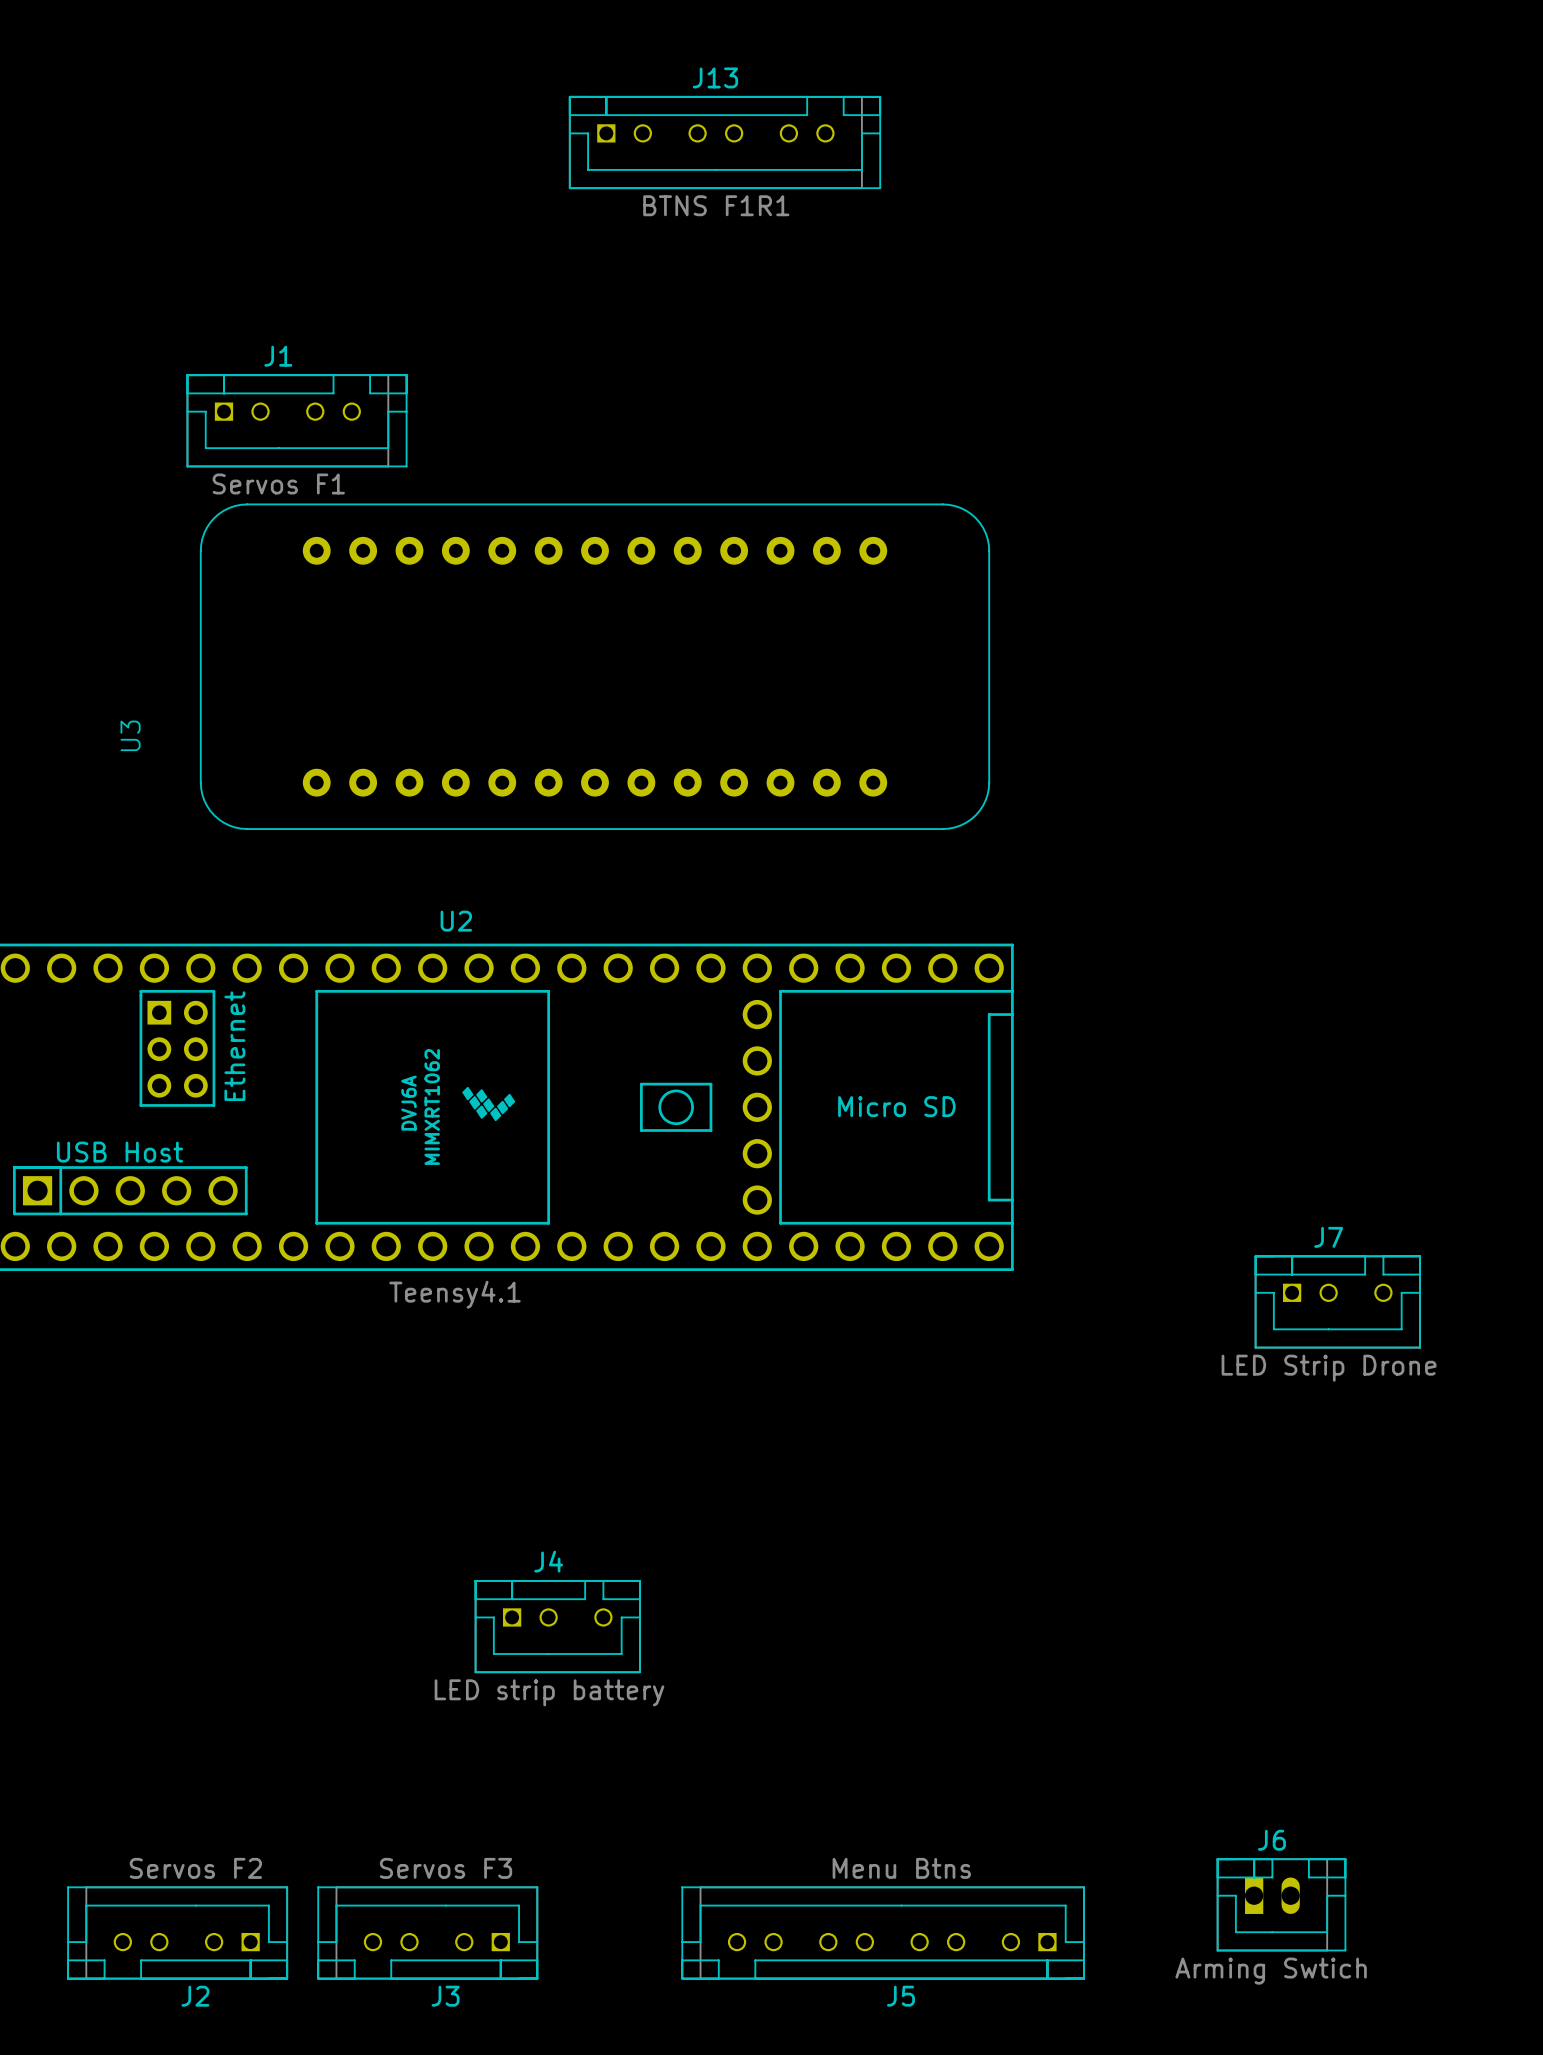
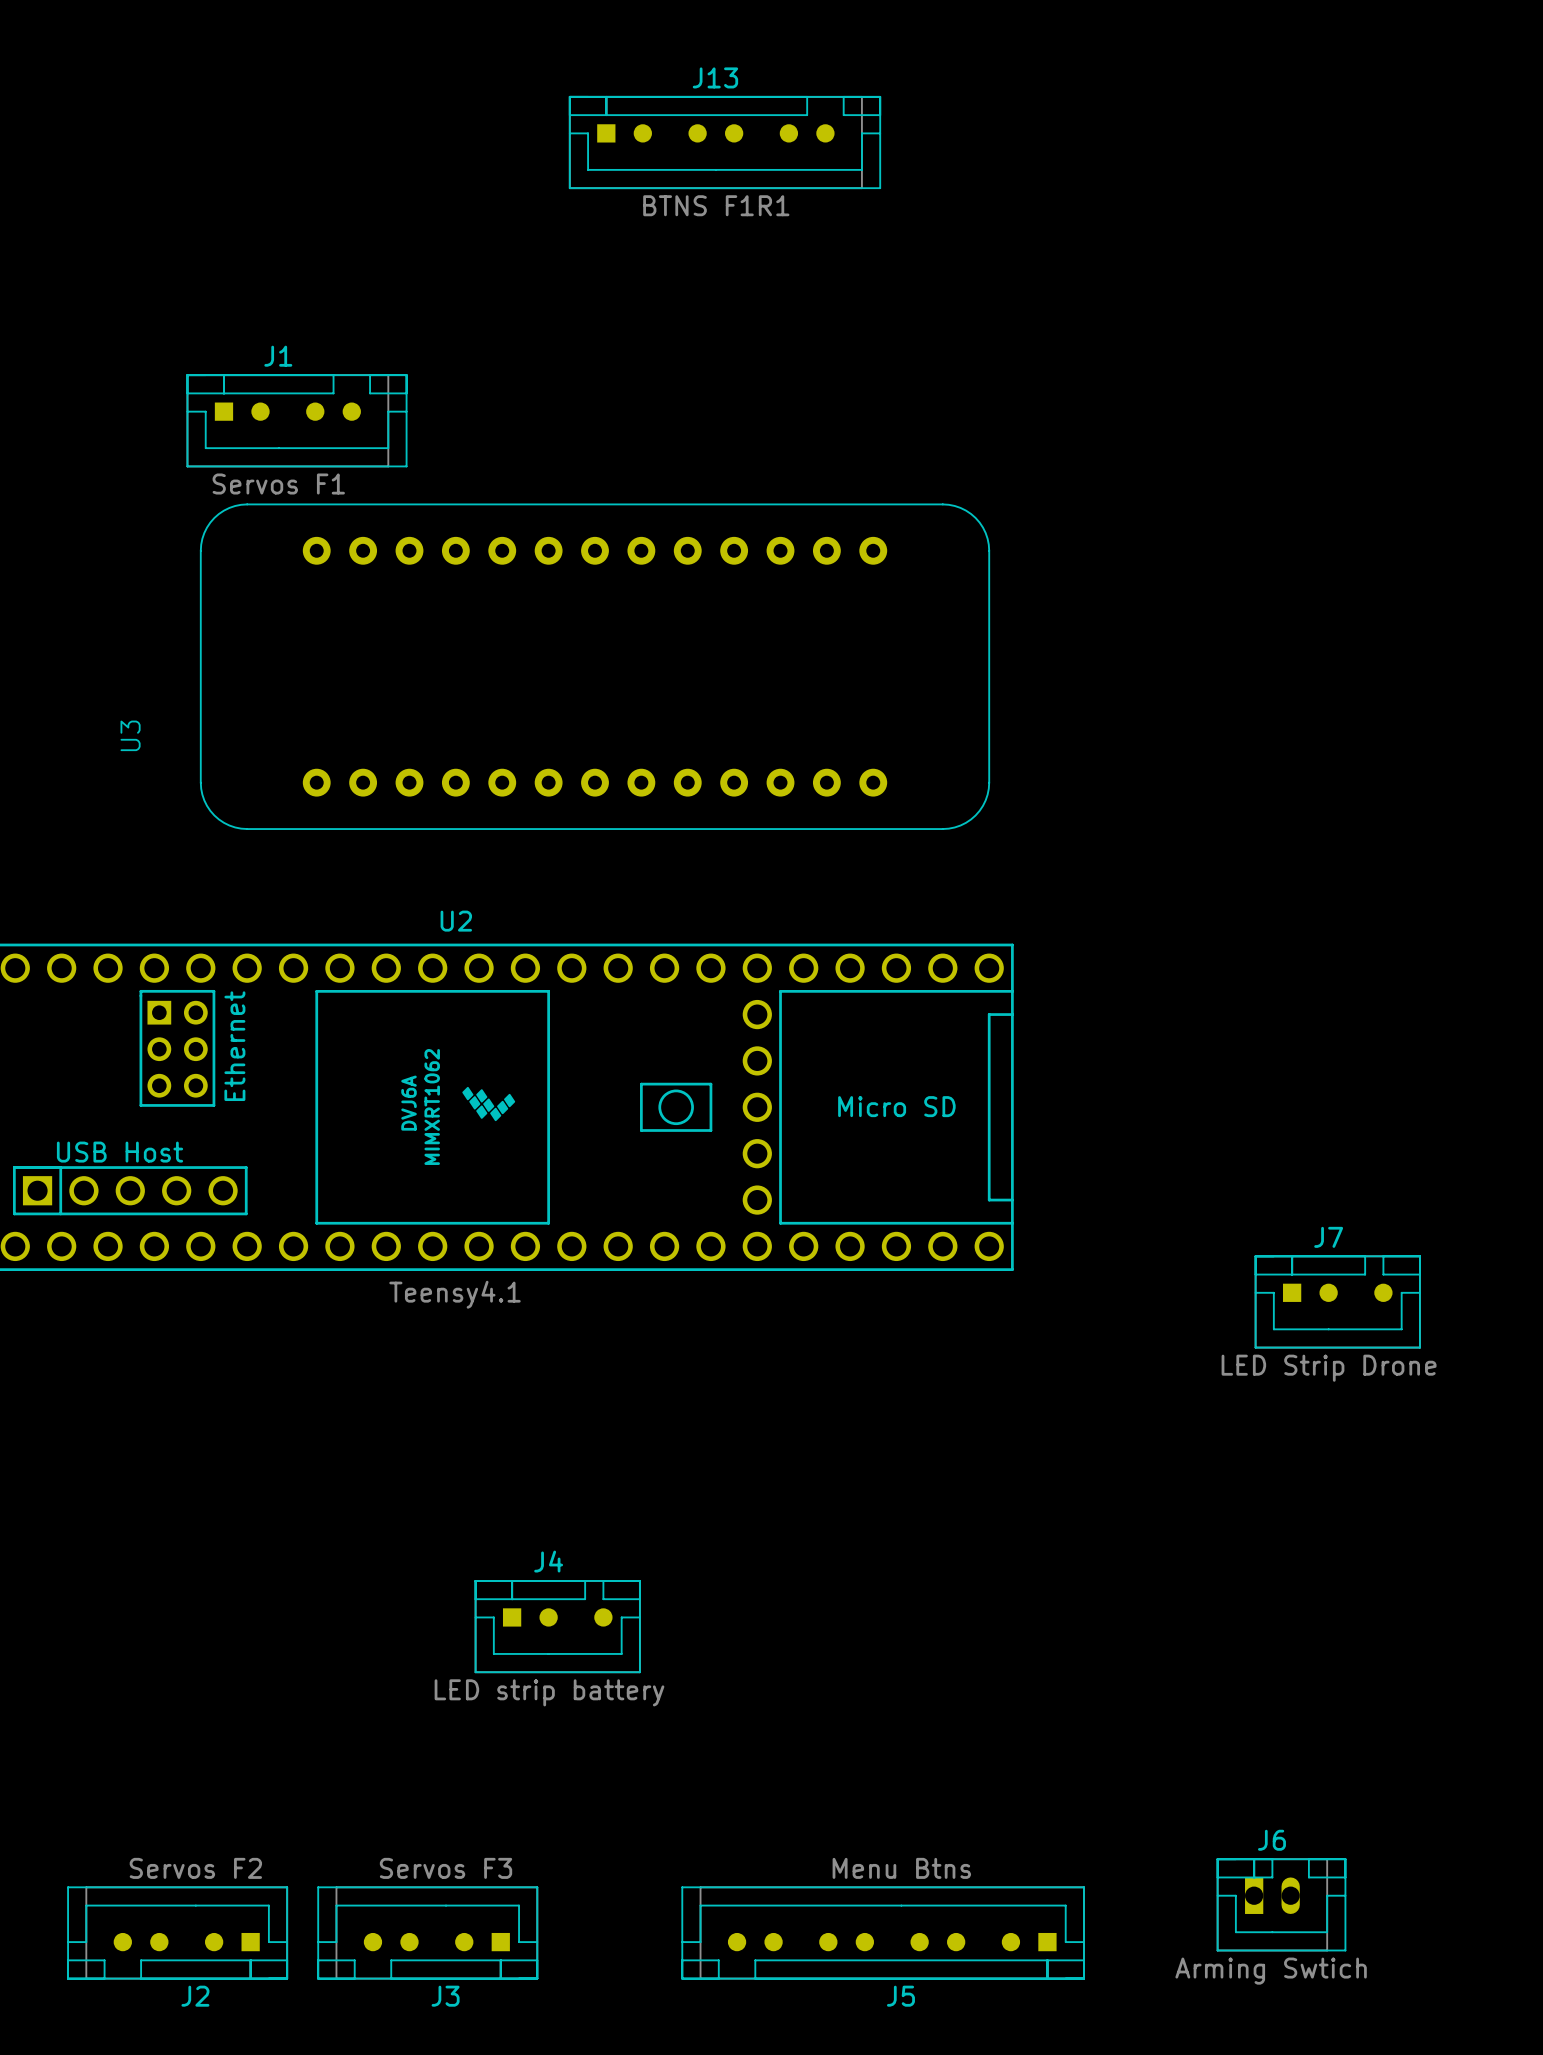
J13 footprint: [568, 95, 882, 190] -> [568, 95, 882, 190]
J1 footprint: [186, 374, 408, 468] -> [186, 374, 408, 468]
J7 footprint: [1254, 1255, 1421, 1349] -> [1254, 1255, 1421, 1349]
J4 footprint: [474, 1580, 641, 1674] -> [474, 1580, 641, 1674]
J2 footprint: [67, 1886, 289, 1980] -> [67, 1886, 289, 1980]
J3 footprint: [317, 1886, 539, 1980] -> [317, 1886, 539, 1980]
J5 footprint: [681, 1886, 1085, 1980] -> [681, 1886, 1085, 1980]

